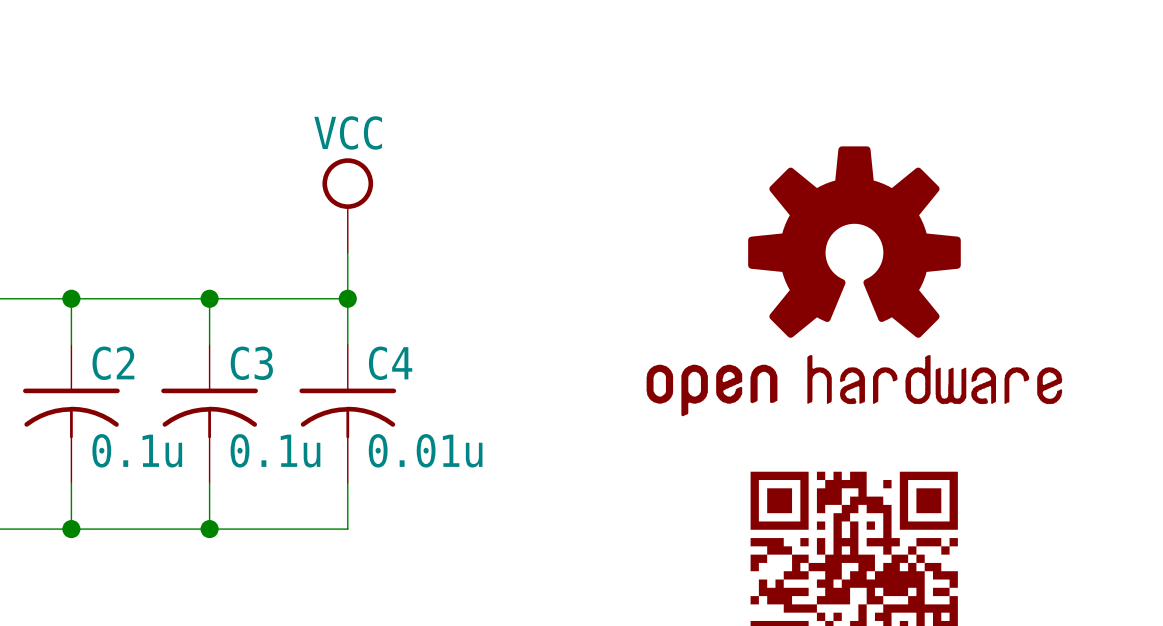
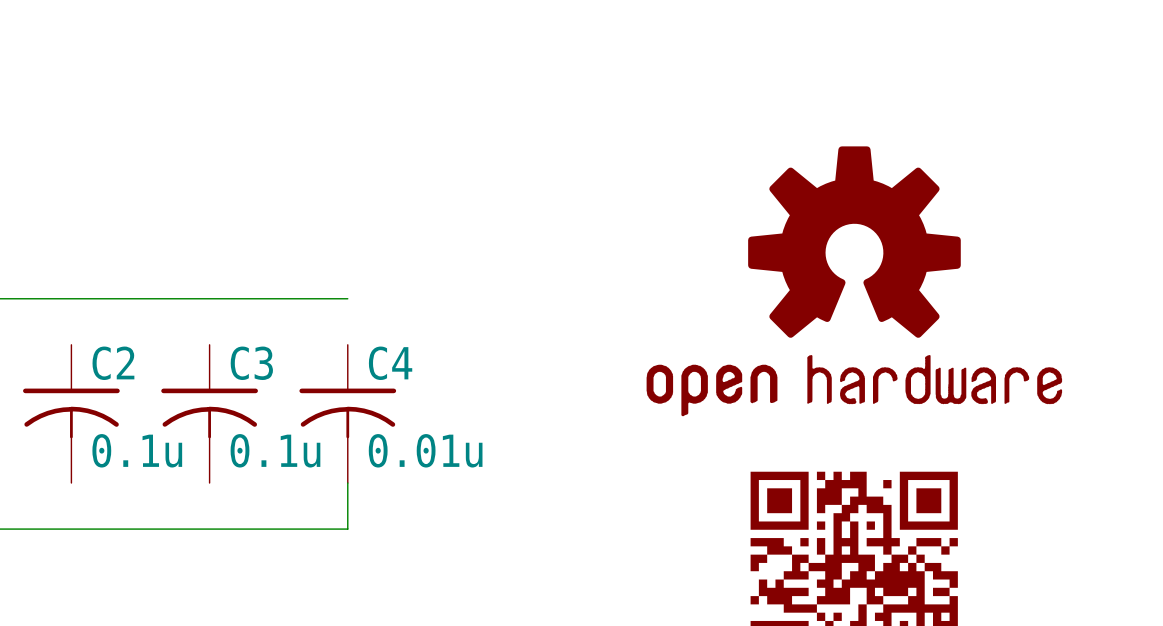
power symbol: VCC (347, 205) -> none
wire: (347, 252) (347, 344) -> none
wire: (71, 298) (71, 344) -> none
junction: (71, 298) -> none
wire: (209, 298) (209, 344) -> none
junction: (209, 298) -> none
junction: (347, 298) -> none
wire: (71, 483) (71, 529) -> none
wire: (209, 483) (209, 529) -> none
junction: (71, 529) -> none
junction: (209, 529) -> none

